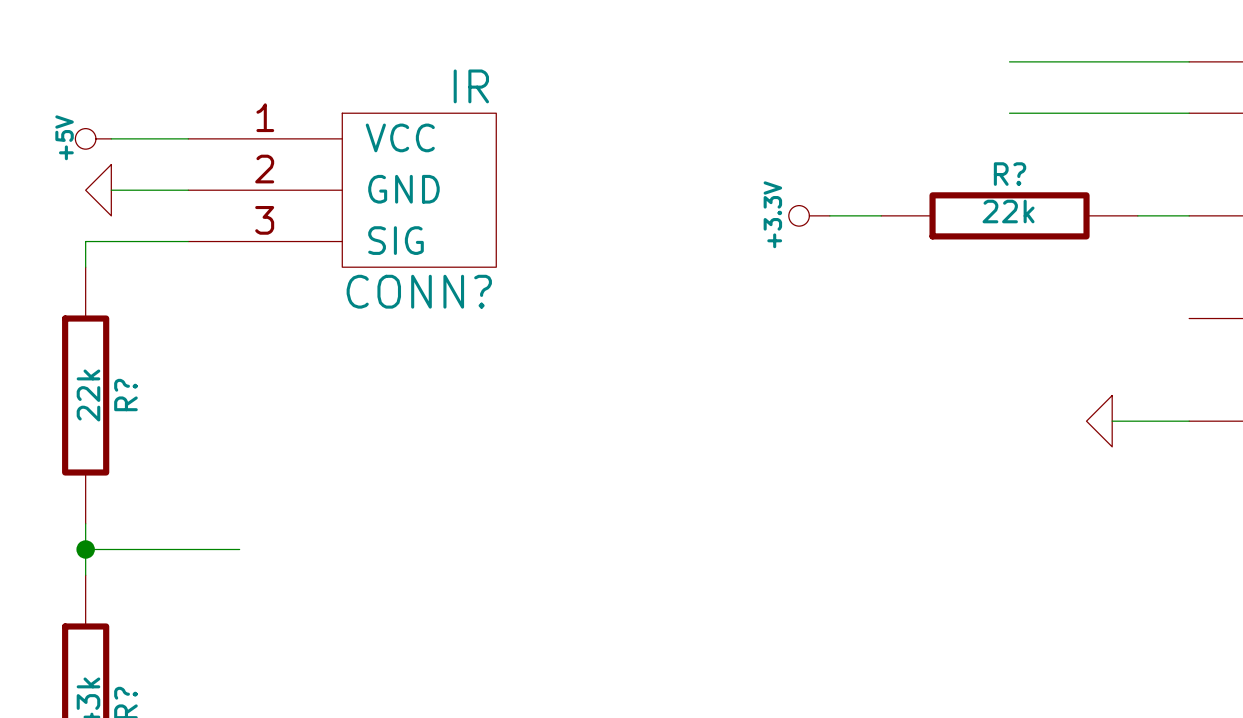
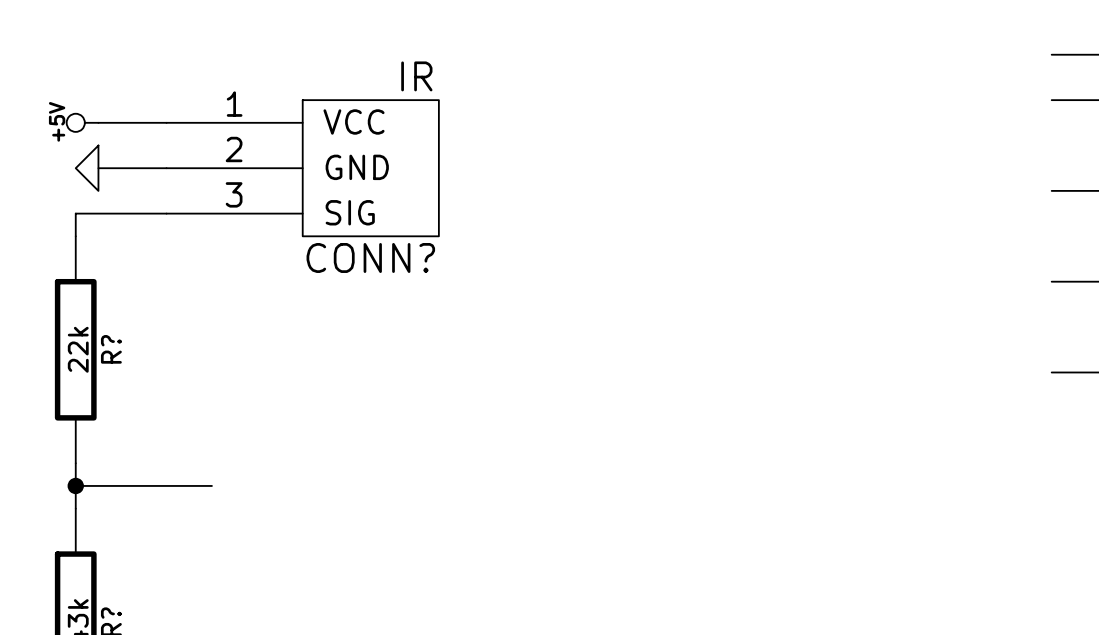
wire: (1009, 61) (1189, 61) -> none
wire: (1009, 113) (1189, 113) -> none
power symbol: +3.3V (809, 215) -> none
wire: (829, 215) (881, 215) -> none
R?: 22k (1009, 215) -> none
wire: (1137, 215) (1189, 215) -> none
power symbol: (1099, 421) -> none
wire: (1112, 421) (1189, 421) -> none

